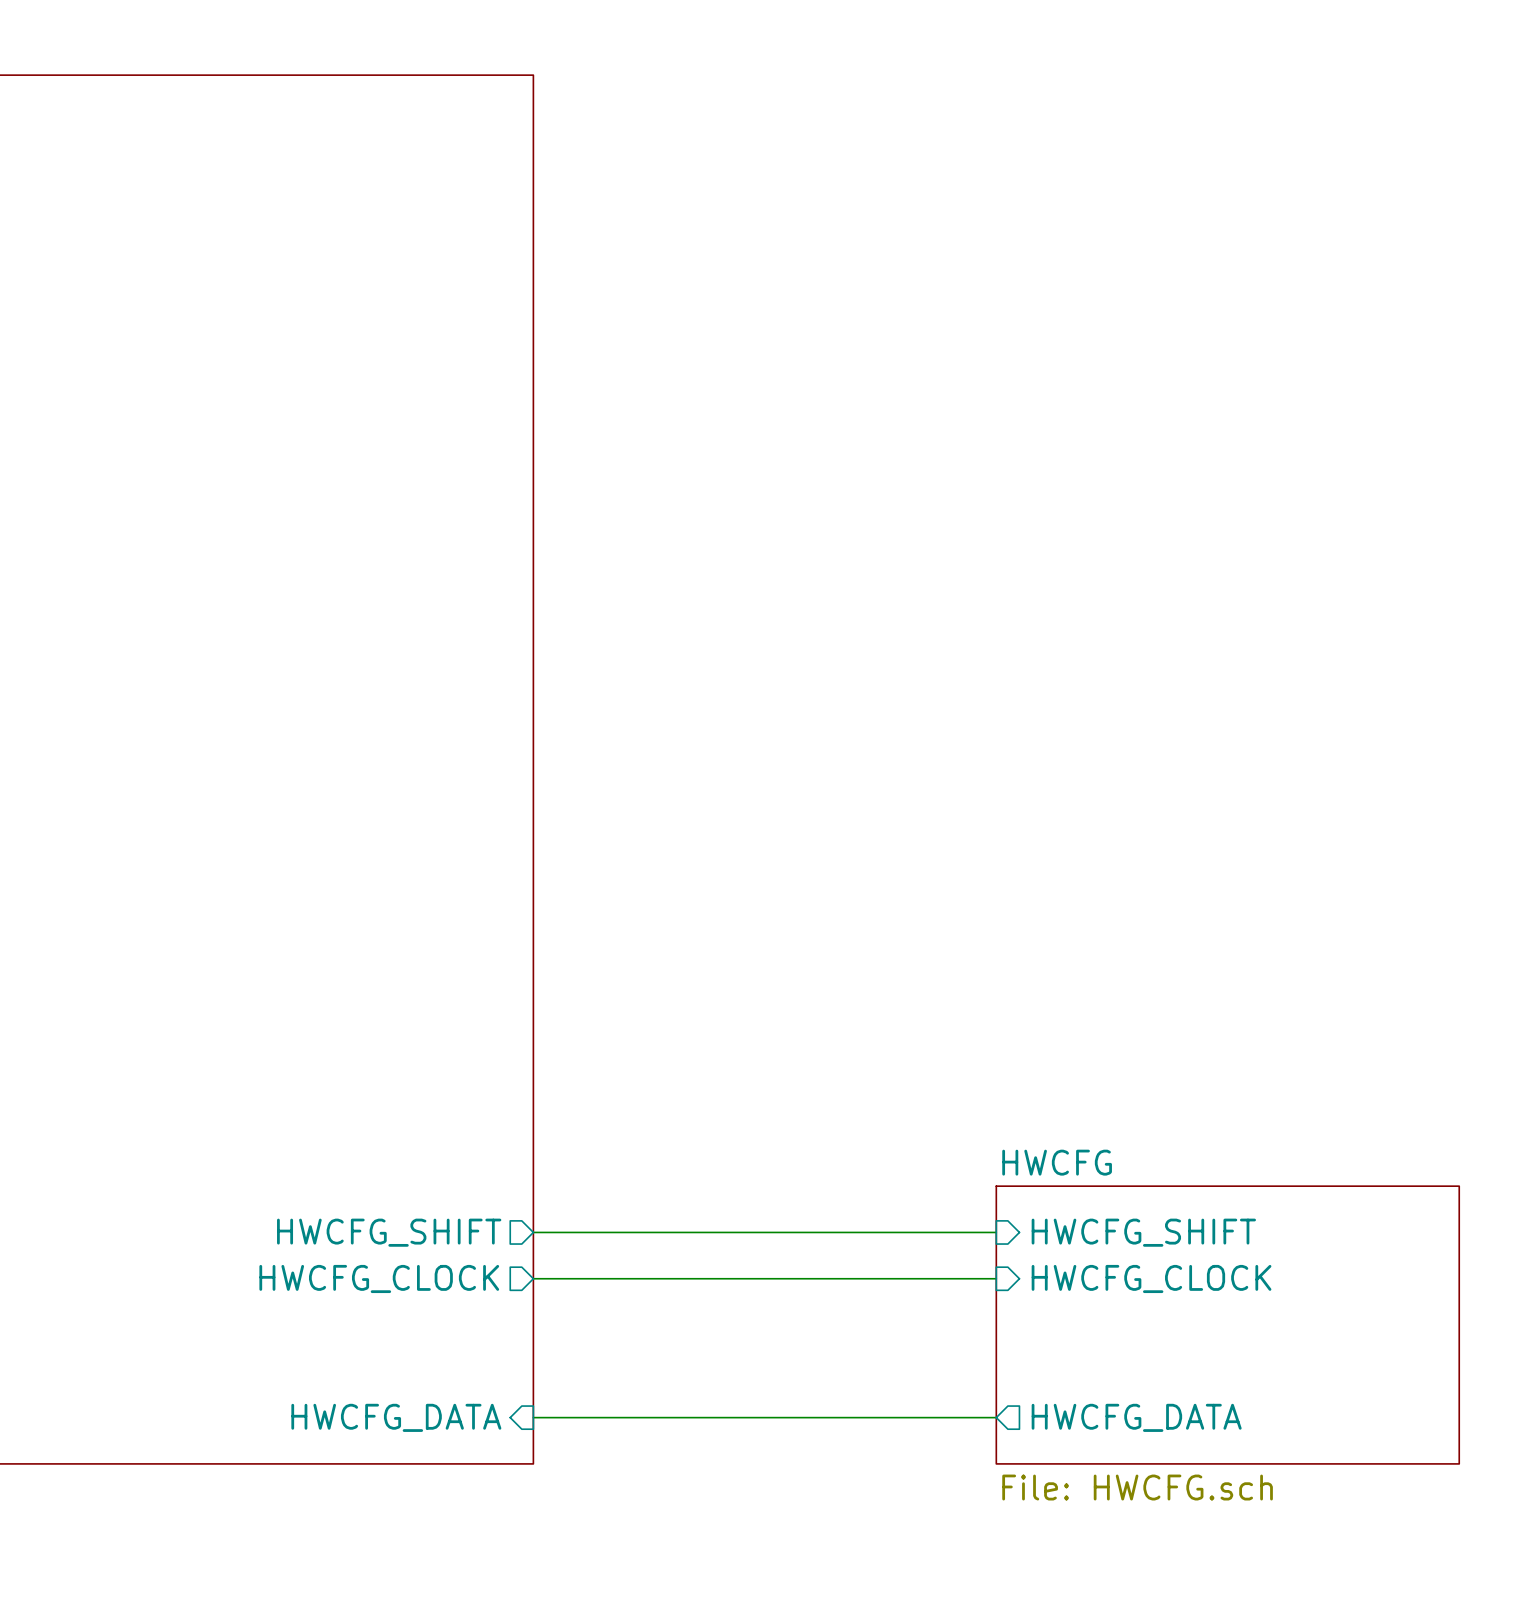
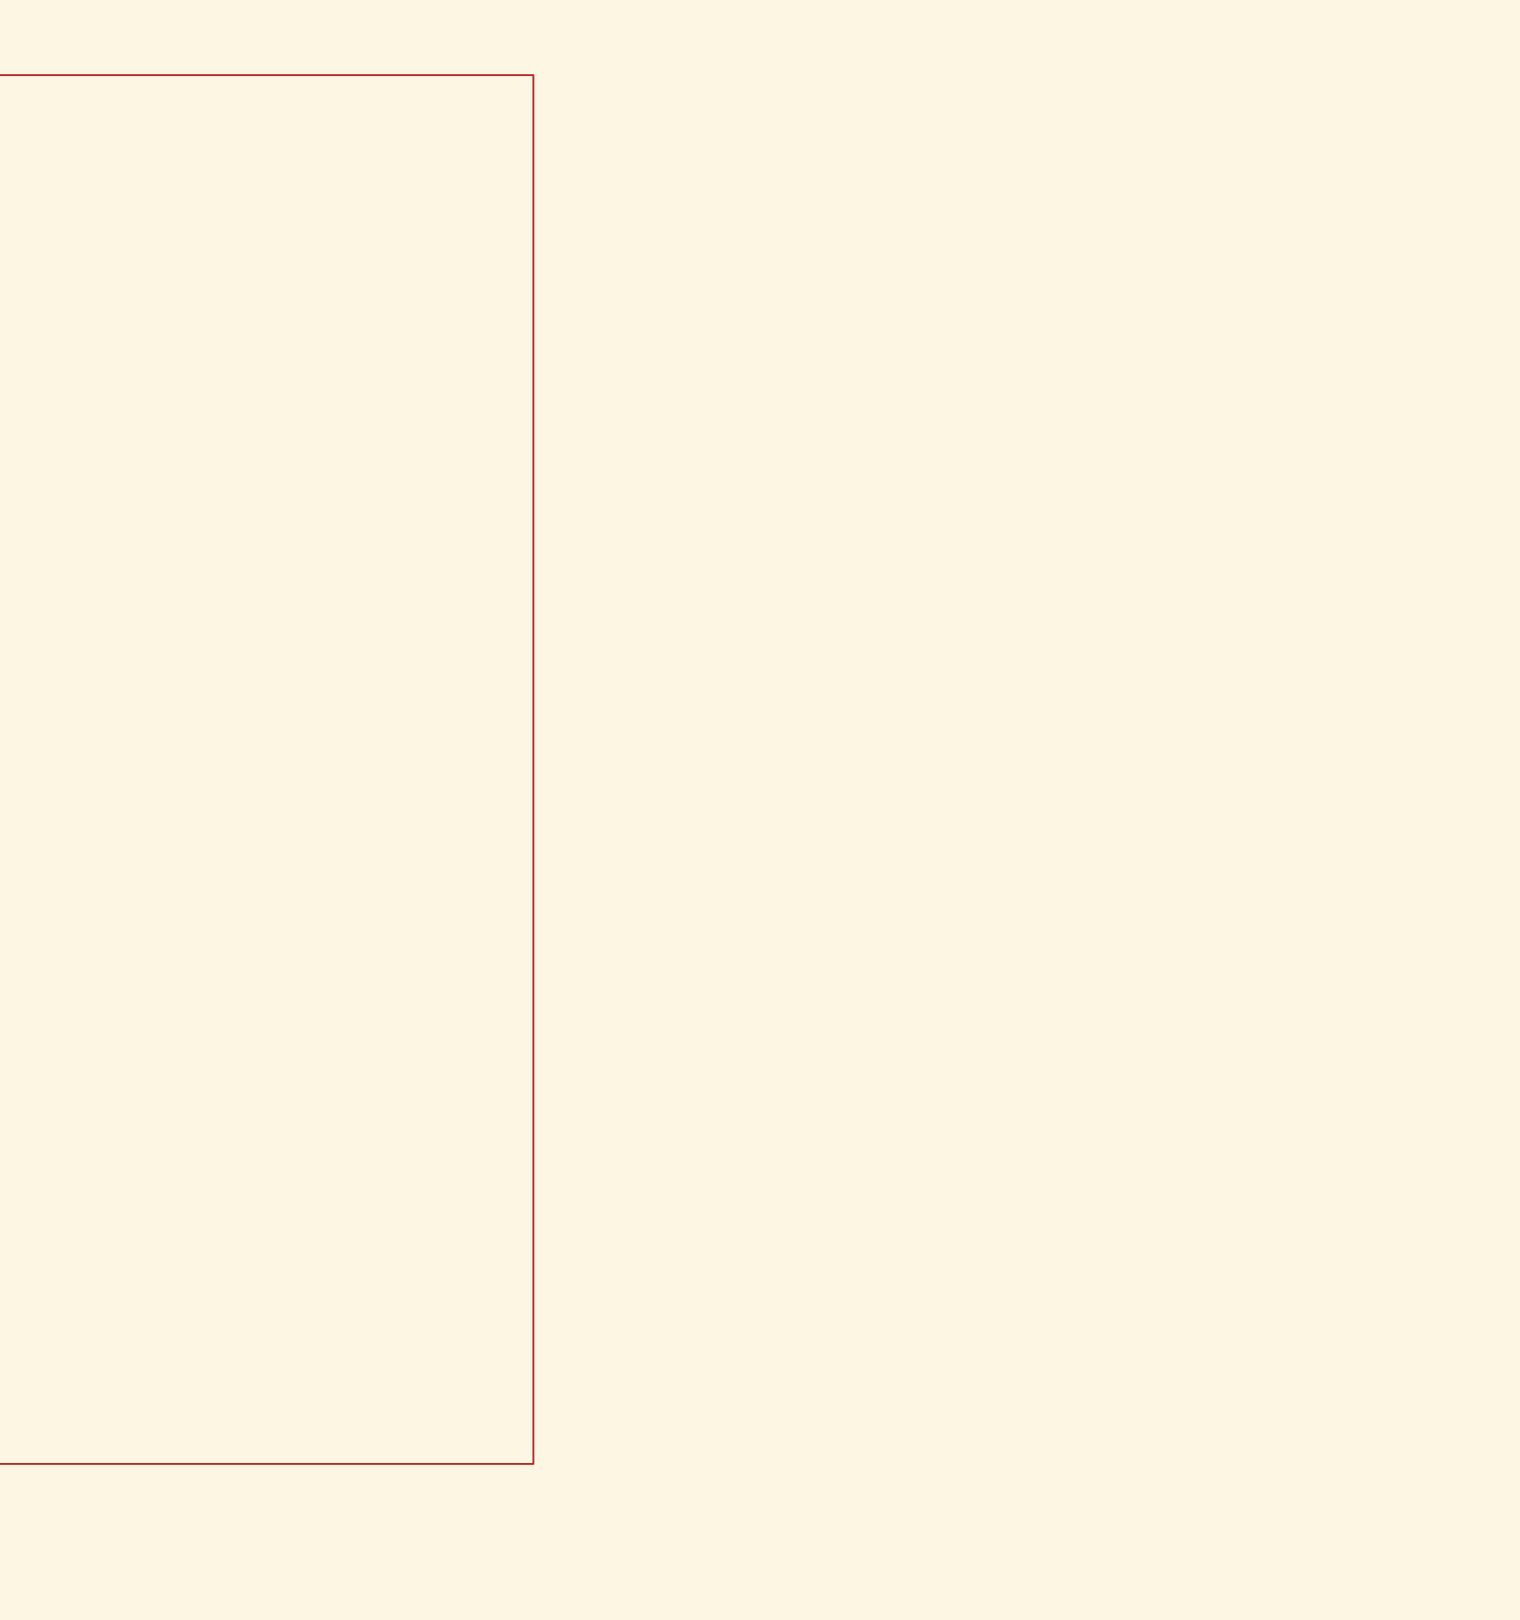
sheet pin: HWCFG_SHIFT (389, 1232) -> none
wire: (533, 1232) (996, 1232) -> none
sheet pin: HWCFG_SHIFT (1143, 1232) -> none
sheet pin: HWCFG_CLOCK (379, 1278) -> none
wire: (533, 1278) (996, 1278) -> none
sheet pin: HWCFG_CLOCK (1151, 1278) -> none
sheet HWCFG: File: HWCFG.sch (1227, 1325) -> none
sheet pin: HWCFG_DATA (396, 1417) -> none
wire: (533, 1417) (996, 1417) -> none
sheet pin: HWCFG_DATA (1136, 1417) -> none

